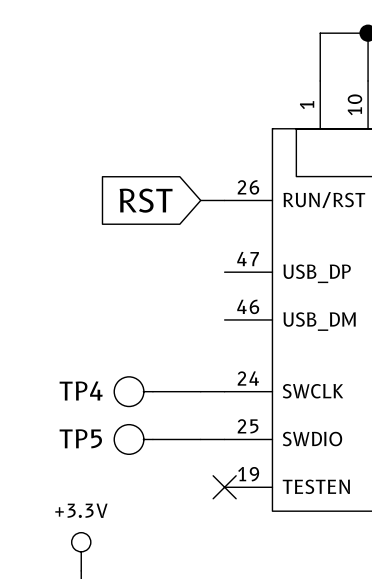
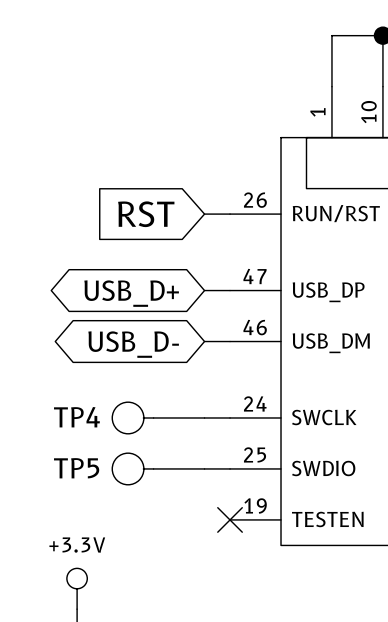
wire: none -> (204, 290) (230, 290)
global label: none -> USB_D+ (131, 293)
wire: none -> (204, 341) (230, 341)
global label: none -> USB_D- (133, 344)

